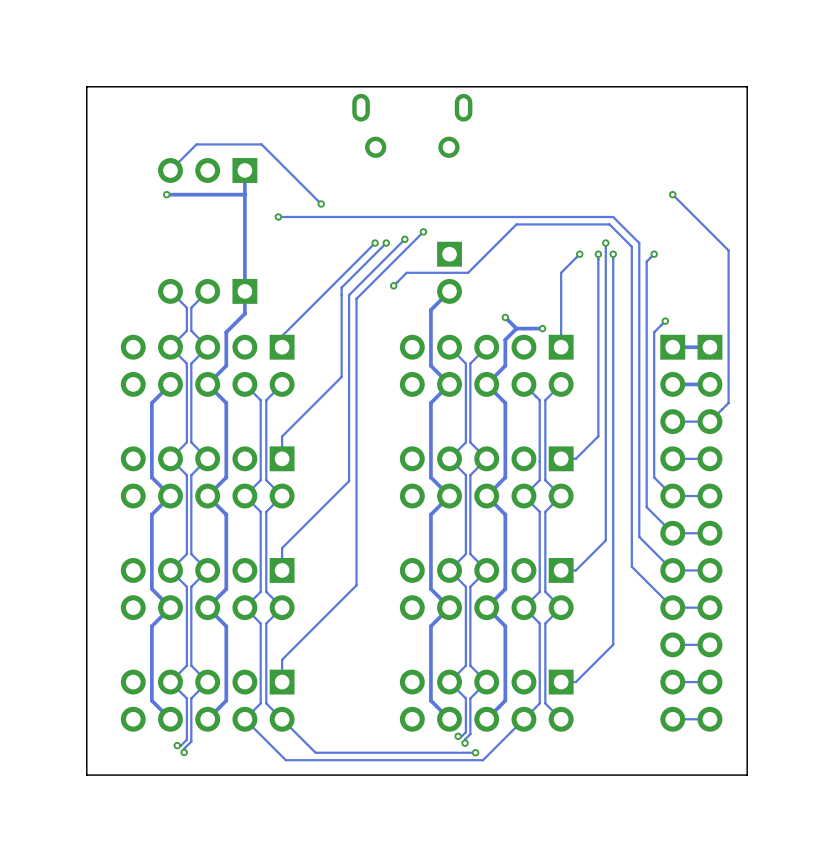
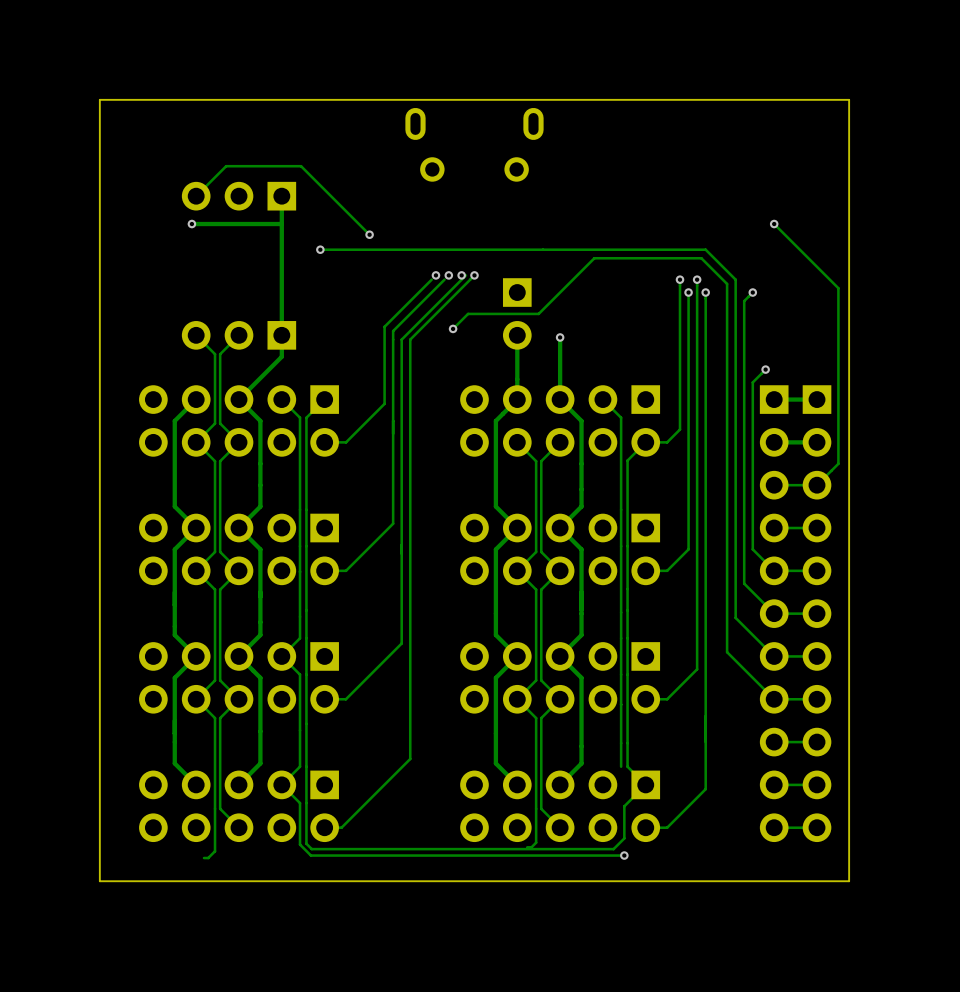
board edge: (737, 86) (747, 86) (747, 775) (86, 775) (86, 765) -> (849, 99) (849, 881) (99, 881)
track: (423, 231) (356, 298) -> (474, 275) (410, 339) (410, 343)
via: (423, 231) -> none
via: none -> (435, 275)
via: none -> (448, 275)
via: none -> (461, 275)
via: (404, 239) -> none
via: none -> (474, 275)
via: (375, 243) -> none
via: (386, 243) -> none
track: none -> (680, 279) (680, 429) (667, 442) (645, 442)
track: (579, 254) (561, 272) (561, 347) -> none
via position: (579, 254) -> (680, 279)
track: (334, 283) (282, 336) (282, 347) -> (384, 326) (384, 403) (346, 442) (324, 442)
track: (449, 291) (430, 310) (430, 365) (449, 384) (430, 403) -> (517, 335) (517, 399) (495, 420) (495, 463)
track: (244, 310) (244, 313) (226, 332) (226, 365) (207, 384) (226, 403) -> (281, 356) (239, 399) (260, 420) (260, 463)
track: (505, 317) (516, 328) -> none
via position: (505, 317) -> (560, 337)
track: (516, 328) (505, 339) (505, 365) (486, 384) (505, 403) -> (560, 337) (560, 399) (581, 420) (581, 463)
track: (542, 328) (516, 328) -> none
via: (542, 328) -> none
track: (186, 330) (170, 347) (186, 363) -> (215, 380) (215, 418)
track: (191, 330) (207, 347) (191, 363) -> (220, 380) (220, 418)
track: (449, 347) (465, 363) (465, 400) -> (517, 442) (536, 461)
track: (486, 347) (470, 363) (470, 400) -> (560, 442) (541, 461)
track: (186, 368) (186, 400) -> (215, 423) (196, 442) (215, 461)
track: (191, 368) (191, 400) -> (220, 423) (239, 442) (220, 461)
track: (341, 376) (282, 436) (282, 458) -> (393, 433) (393, 523) (346, 570) (324, 570)
track: (170, 384) (151, 403) -> (196, 399) (174, 420) (174, 463)
track: (244, 384) (260, 400) -> (281, 399) (300, 417) (300, 460)
track: (282, 384) (266, 400) -> (324, 399) (306, 417) (306, 460)
track: (523, 384) (539, 400) -> (602, 399) (621, 417) (621, 460)
track: (598, 436) (575, 458) (561, 458) -> (688, 502) (688, 549) (667, 570) (645, 570)
track: (151, 440) (151, 477) (170, 496) (151, 514) -> (174, 506) (196, 528) (174, 549) (174, 592)
track: (226, 440) (226, 477) (207, 496) (226, 514) -> (260, 506) (239, 528) (260, 549) (260, 592)
track: (430, 440) (430, 477) (449, 496) (430, 514) -> (495, 506) (517, 528) (495, 549) (495, 592)
track: (505, 440) (505, 477) (486, 496) (505, 514) -> (581, 506) (560, 528) (581, 549) (581, 592)
track: (186, 442) (170, 458) (186, 475) -> (215, 509) (215, 546)
track: (191, 442) (207, 458) (191, 475) -> (220, 509) (220, 546)
track: (465, 442) (449, 458) (465, 475) -> (536, 509) (536, 546)
track: (470, 442) (486, 458) (470, 475) -> (541, 509) (541, 546)
track: (186, 479) (186, 512) -> (215, 551) (196, 570) (215, 589)
track: (191, 479) (191, 512) -> (220, 551) (239, 570) (220, 589)
track: (465, 479) (465, 512) -> (536, 551) (517, 570) (536, 589)
track: (470, 479) (470, 512) -> (541, 551) (560, 570) (541, 589)
track: (260, 480) (244, 496) (260, 511) -> (300, 552) (300, 589)
track: (266, 480) (282, 496) (266, 511) -> (306, 552) (306, 589)
track: (539, 480) (523, 496) (539, 511) -> (621, 552) (621, 589)
track: (545, 480) (561, 496) (545, 511) -> (627, 552) (627, 589)
track: (349, 481) (282, 548) (282, 570) -> (401, 553) (401, 643) (345, 699) (324, 699)
track: (605, 540) (575, 570) (561, 570) -> (697, 621) (697, 669) (667, 699) (645, 699)
track: (151, 551) (151, 589) (170, 607) (151, 626) -> (174, 635) (196, 656) (174, 677) (174, 720)
track: (226, 551) (226, 589) (207, 607) (226, 626) -> (260, 635) (239, 656) (260, 677) (260, 720)
track: (430, 551) (430, 589) (449, 607) (430, 626) -> (495, 635) (517, 656) (495, 677) (495, 720)
track: (505, 551) (505, 589) (486, 607) (505, 626) -> (581, 635) (560, 656) (581, 677) (581, 720)
track: (186, 554) (170, 570) (186, 586) -> (215, 637) (215, 675)
track: (191, 554) (207, 570) (191, 586) -> (220, 637) (220, 675)
track: (260, 554) (260, 586) -> (300, 638) (281, 656) (300, 674)
track: (465, 554) (449, 570) (465, 586) -> (536, 637) (536, 675)
track: (470, 554) (486, 570) (470, 586) -> (541, 637) (541, 675)
track: (356, 585) (282, 659) (282, 682) -> (410, 673) (410, 758) (341, 827) (324, 827)
track: (186, 591) (186, 624) -> (215, 680) (196, 699) (215, 718)
track: (191, 591) (191, 624) -> (220, 680) (239, 699) (220, 718)
track: (260, 591) (244, 607) (260, 623) -> (300, 681) (300, 717)
track: (266, 591) (282, 607) (266, 623) -> (306, 681) (306, 717)
track: (465, 591) (465, 624) -> (536, 680) (517, 699) (536, 718)
track: (470, 591) (470, 624) -> (541, 680) (560, 699) (541, 718)
track: (539, 591) (523, 607) (539, 623) -> (621, 681) (621, 717)
track: (545, 591) (561, 607) (545, 623) -> (627, 681) (627, 717)
track: (613, 644) (575, 682) (561, 682) -> (705, 741) (705, 789) (667, 827) (645, 827)
track: (151, 663) (151, 700) (170, 719) -> (174, 763) (196, 784)
track: (226, 663) (226, 700) (207, 719) -> (260, 763) (239, 784)
track: (430, 663) (430, 700) (449, 719) -> (495, 763) (517, 784)
track: (505, 663) (505, 700) (486, 719) -> (581, 763) (560, 784)
track: (186, 665) (170, 682) (186, 698) -> (215, 766) (215, 803)
track: (191, 665) (207, 682) (191, 698) -> (220, 766) (220, 803)
track: (465, 665) (449, 682) (465, 698) -> (536, 766) (536, 803)
track: (470, 665) (486, 682) (470, 698) -> (541, 766) (541, 803)
track: (260, 666) (260, 697) -> (300, 766) (281, 784) (300, 803)
track: (539, 666) (539, 703) (483, 760) (285, 760) (244, 719) (260, 703) -> (624, 855) (310, 855) (300, 844) (300, 809)
track: (545, 666) (545, 703) (561, 719) -> none
track: (191, 702) (191, 741) (184, 748) (184, 752) -> (220, 808) (239, 827)
track: (470, 702) (470, 734) (465, 739) (465, 743) -> (541, 808) (560, 827)
track: (266, 703) (315, 752) (475, 752) -> (306, 809) (306, 843) (311, 849) (613, 849) (624, 838) (624, 806) (645, 784) (627, 766)
via: (458, 736) -> none
via: (465, 743) -> none
via: none -> (624, 855)
via: (177, 745) -> none
via: (184, 752) -> none
via: (475, 752) -> none

